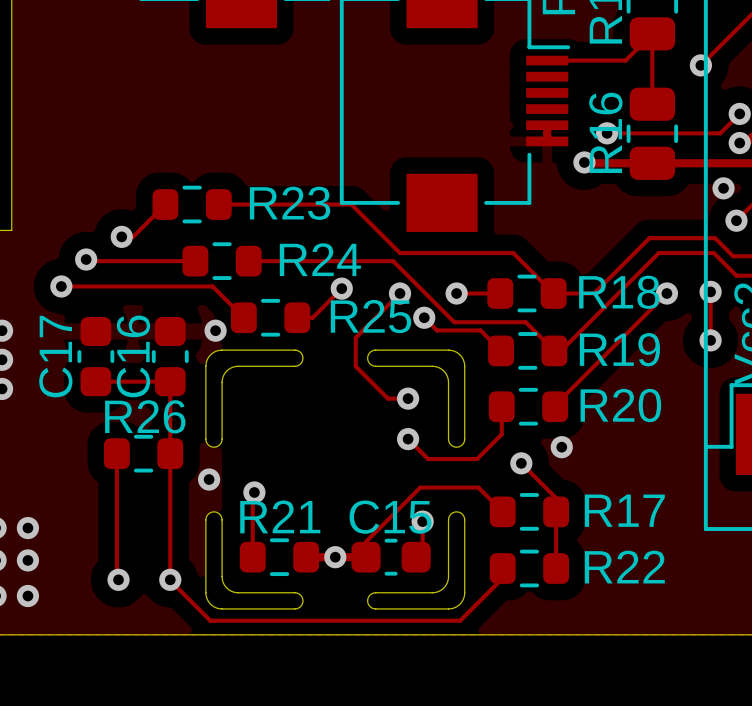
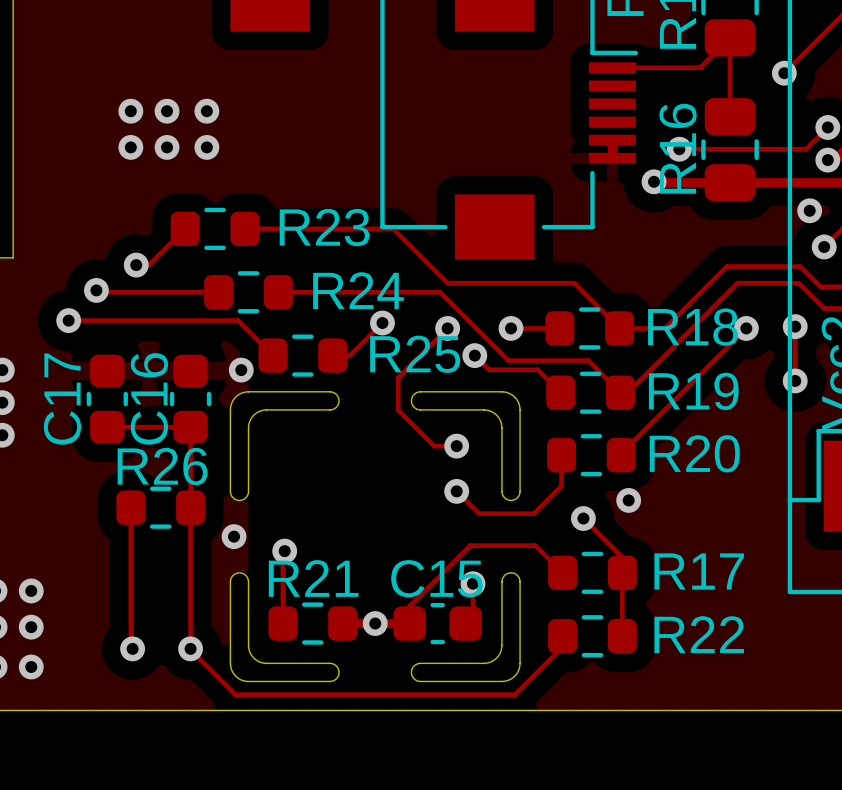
via: none -> (130, 111)
via: none -> (167, 111)
via: none -> (206, 111)
via: none -> (130, 147)
via: none -> (167, 147)
via: none -> (206, 147)

